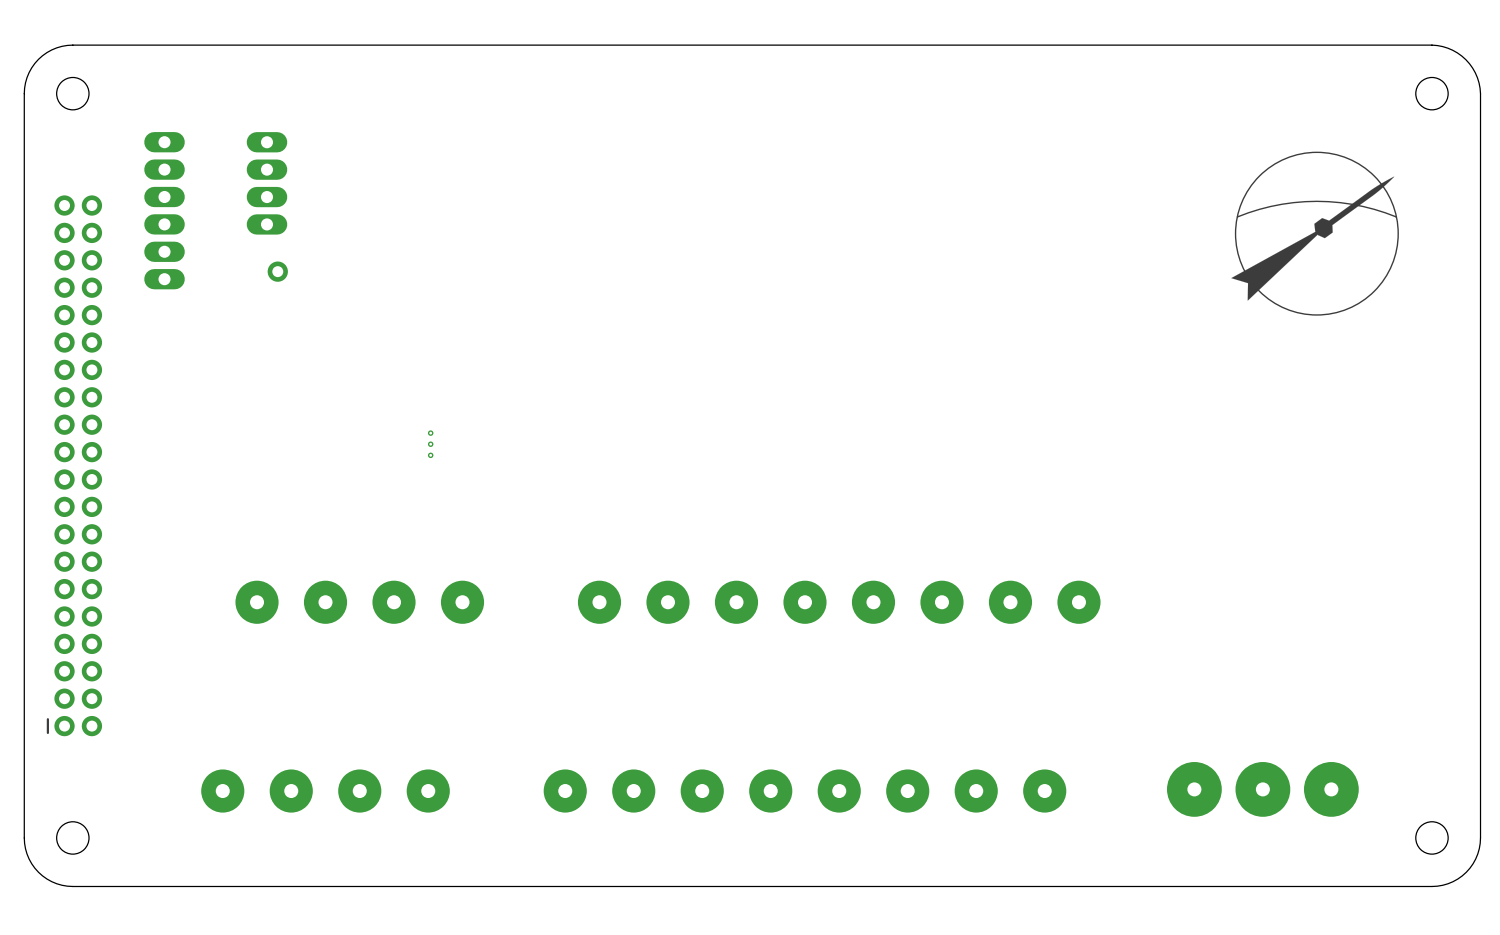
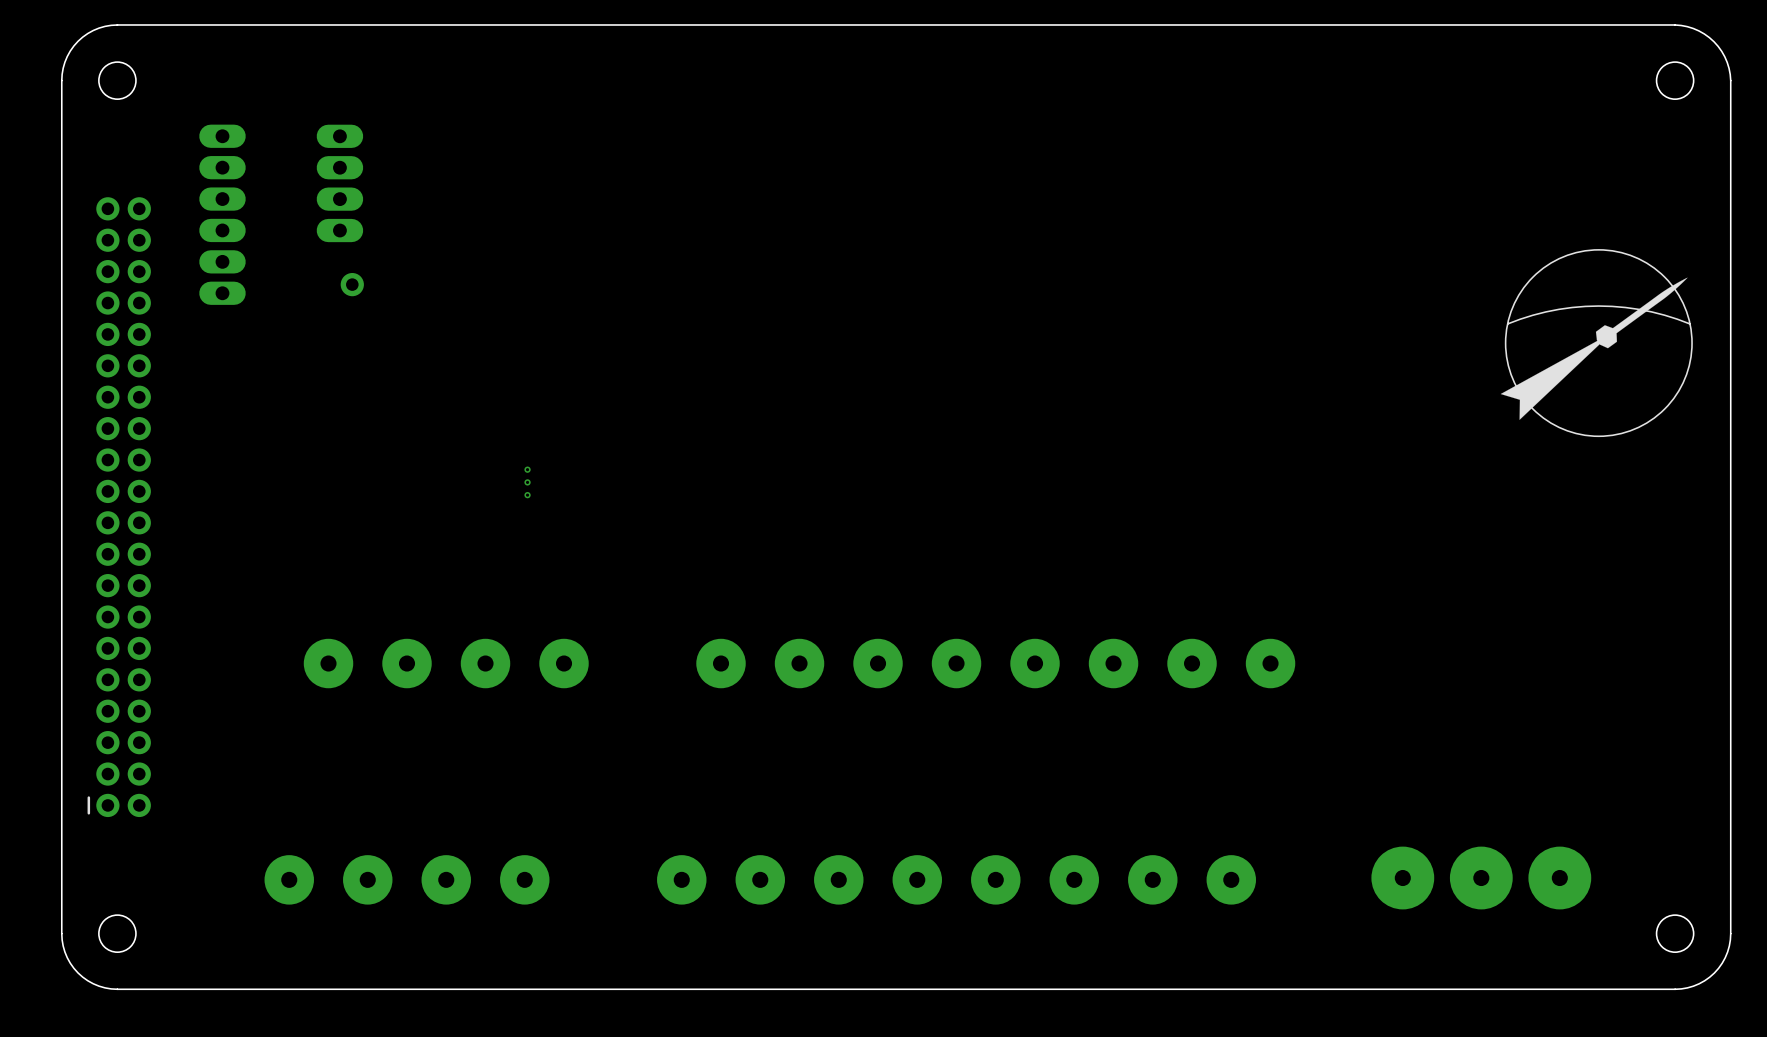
drawing position: (1315, 233) -> (1596, 343)

